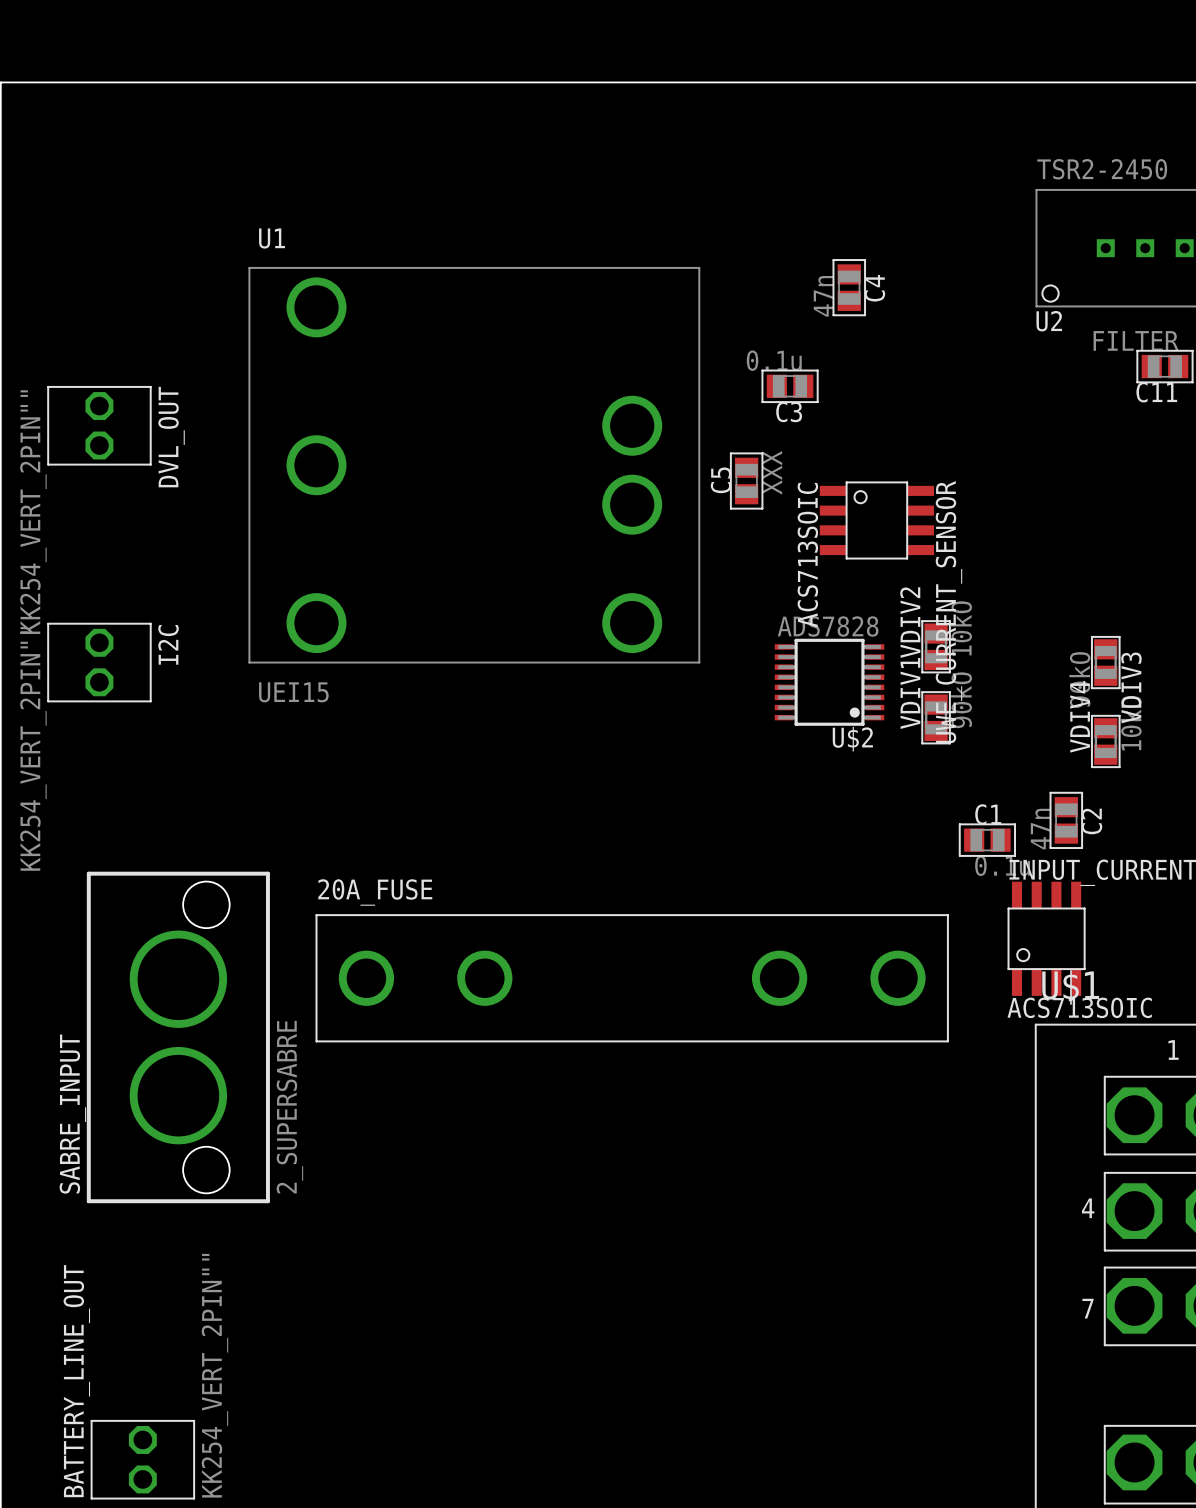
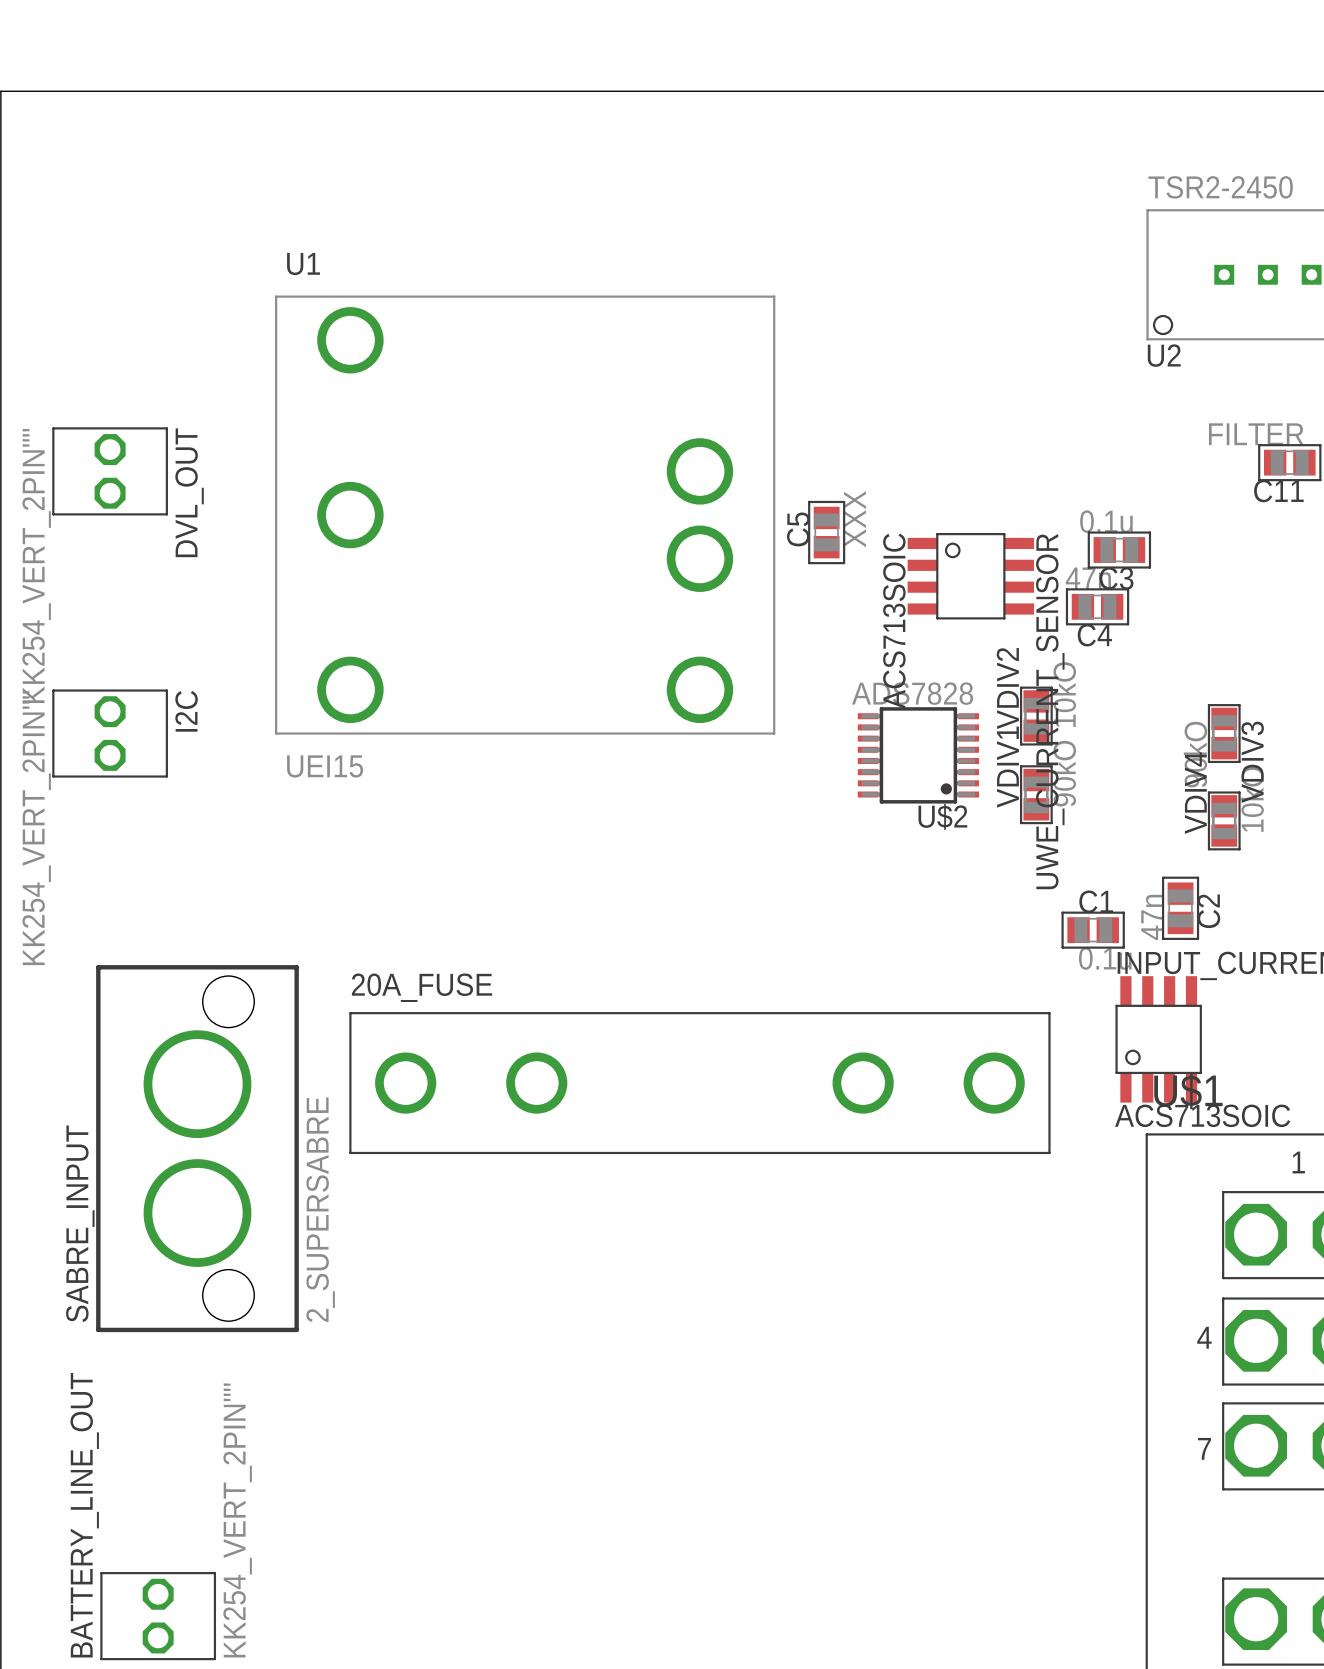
C4 rotation: 0° (849, 287) -> 90° clockwise (1097, 606)
C4 position: (849, 287) -> (1097, 606)
C11 position: (1164, 366) -> (1289, 462)
C3 position: (790, 386) -> (1119, 550)

